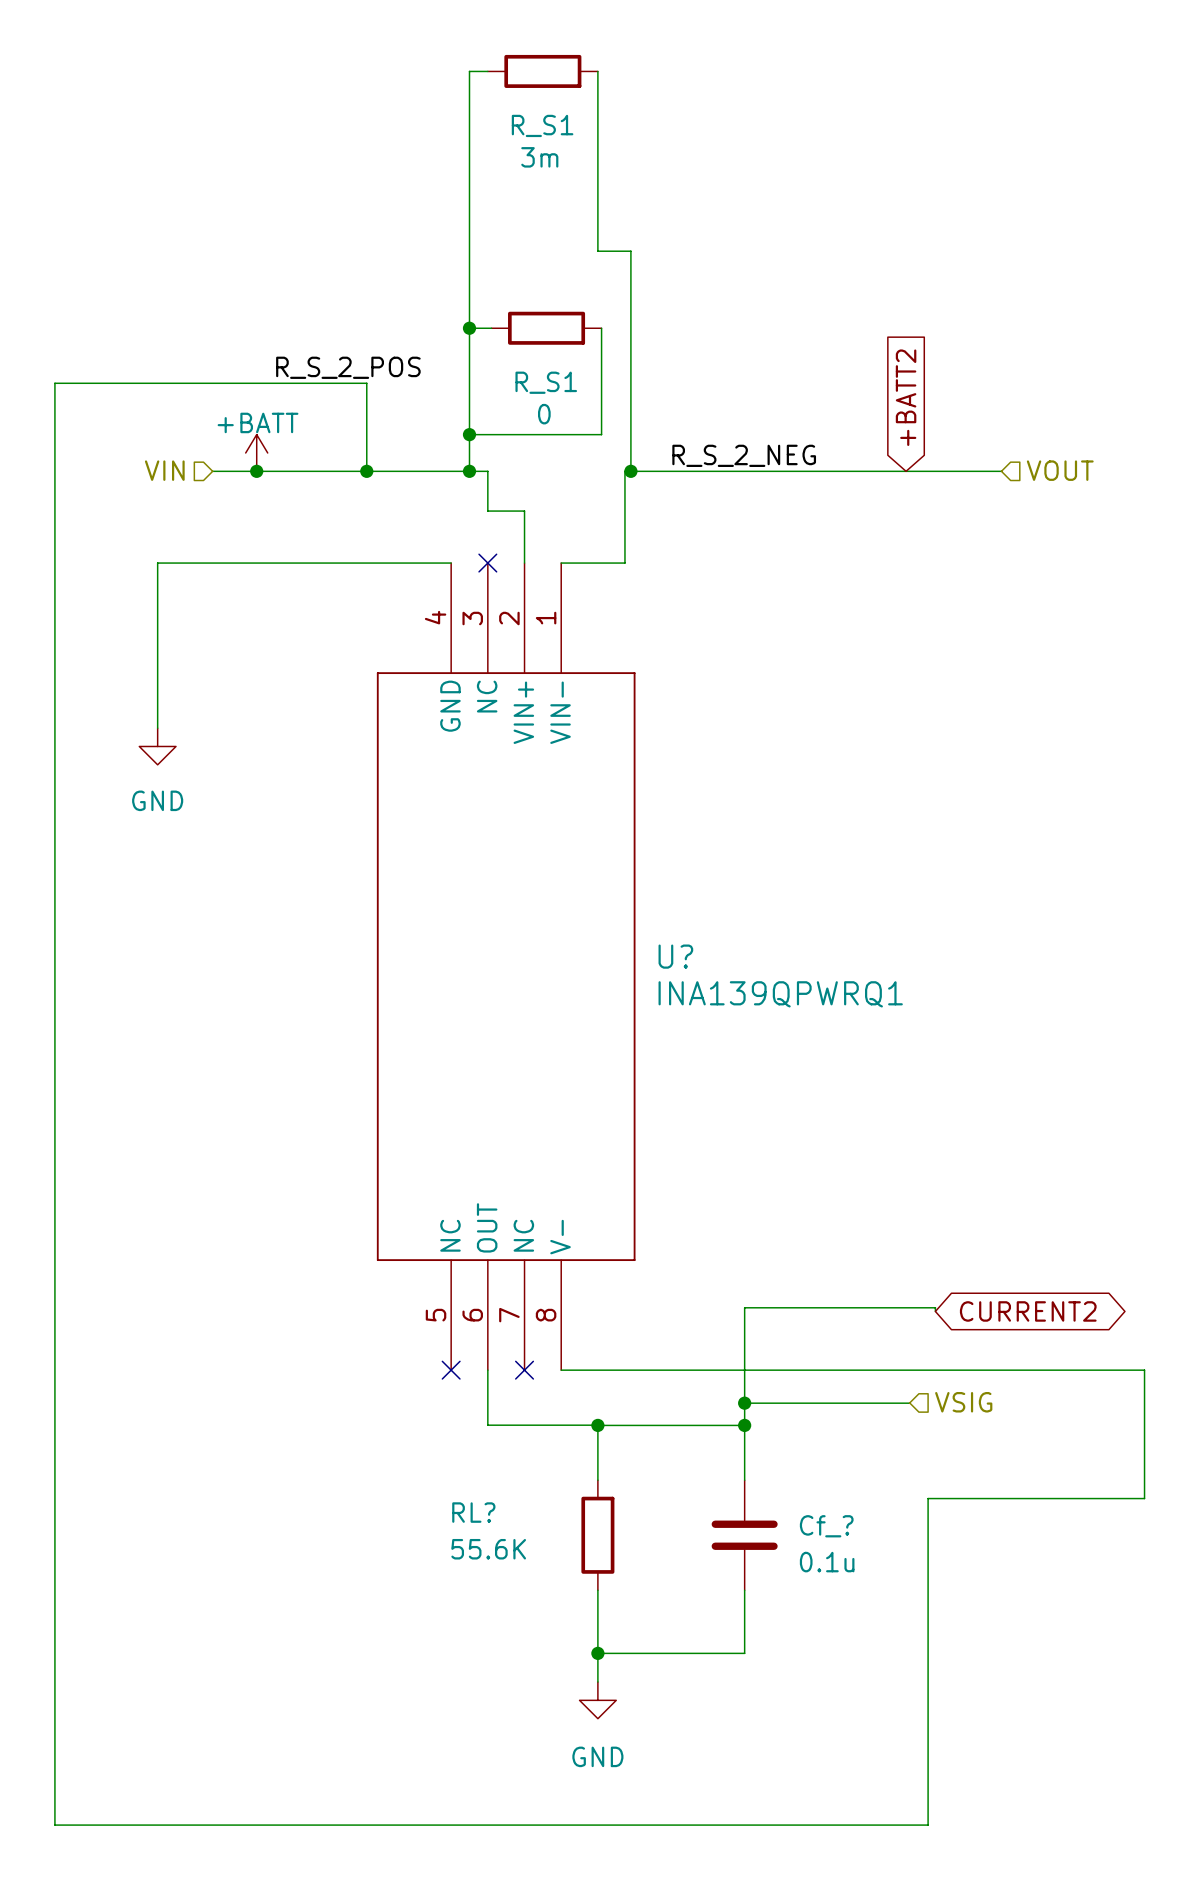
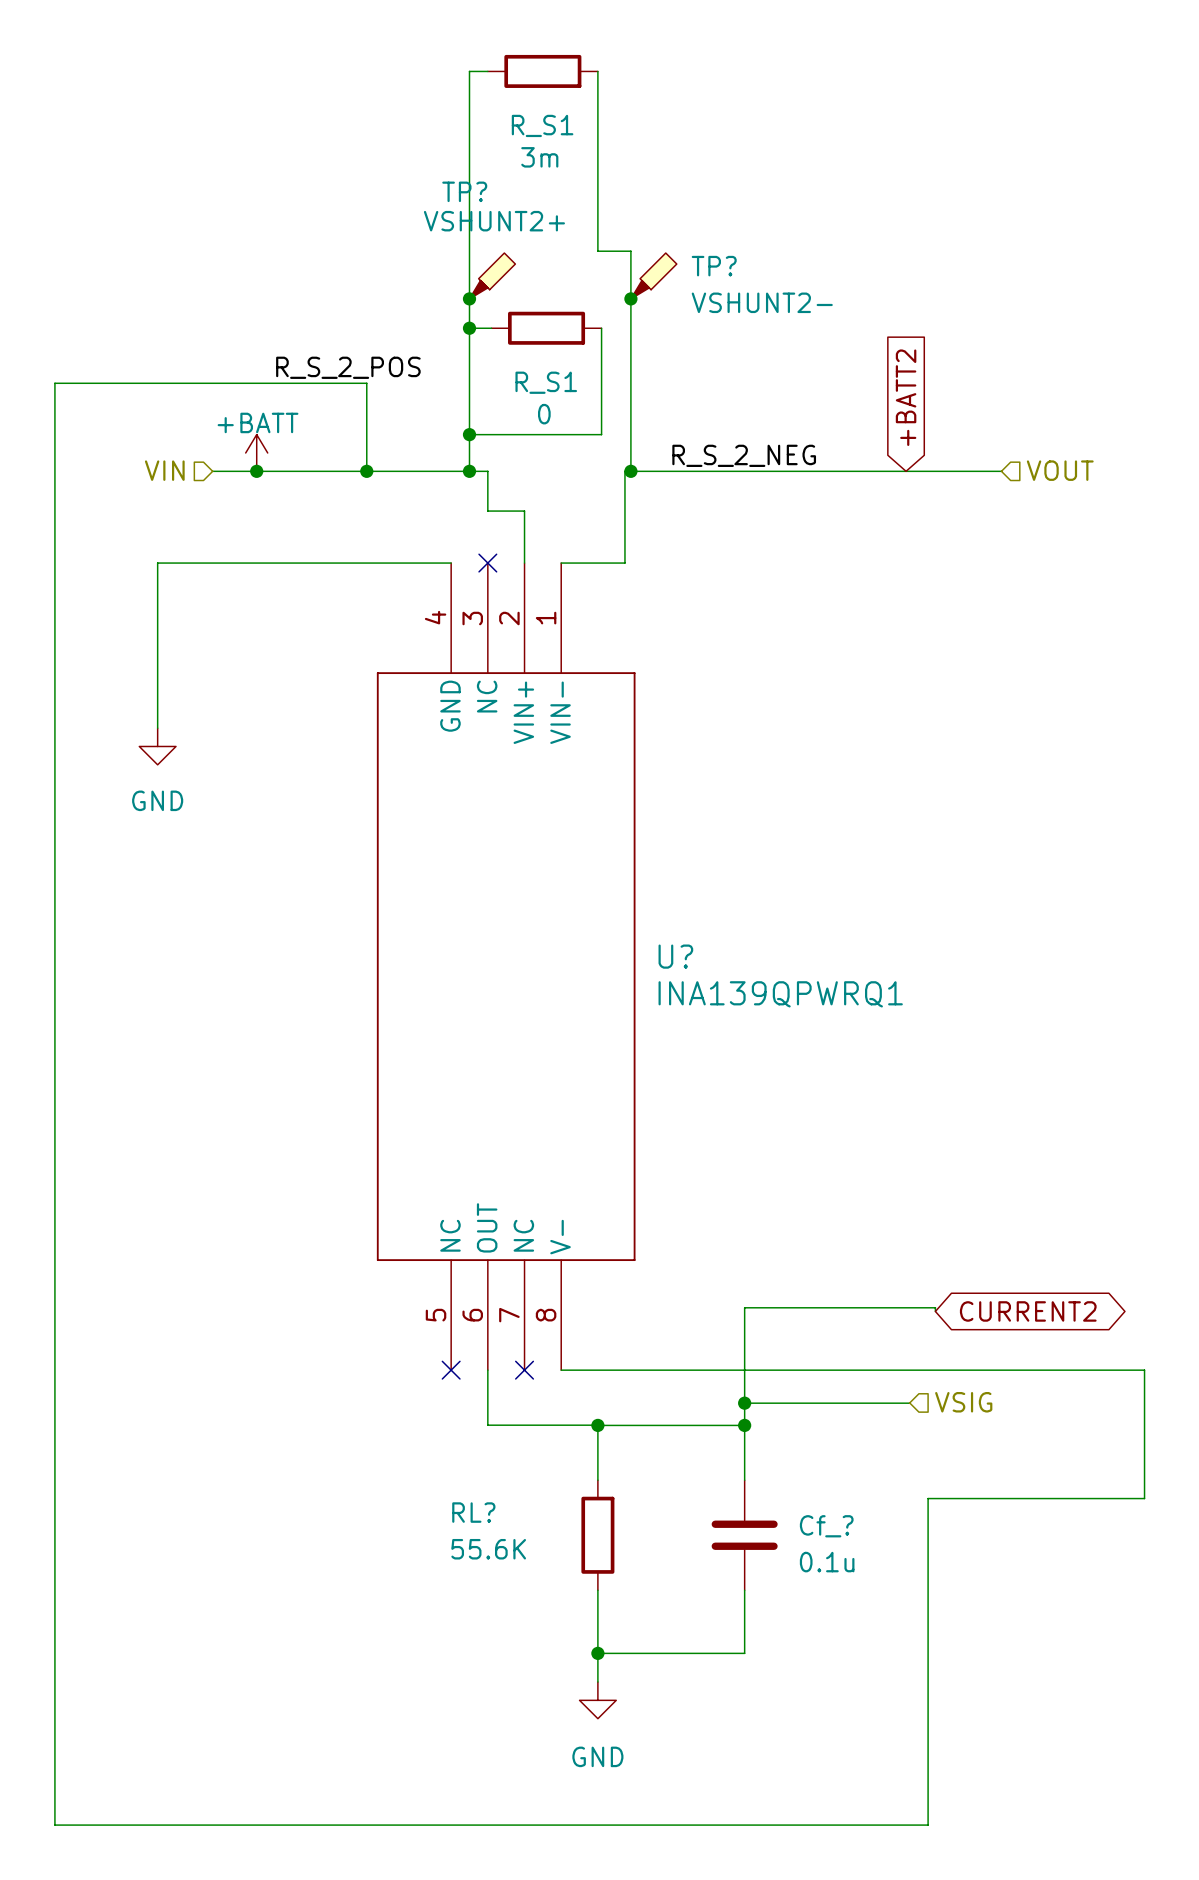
TP?: none -> VSHUNT2+ (492, 275)
TP?: none -> VSHUNT2- (653, 275)
junction: none -> (469, 298)
junction: none -> (630, 298)

